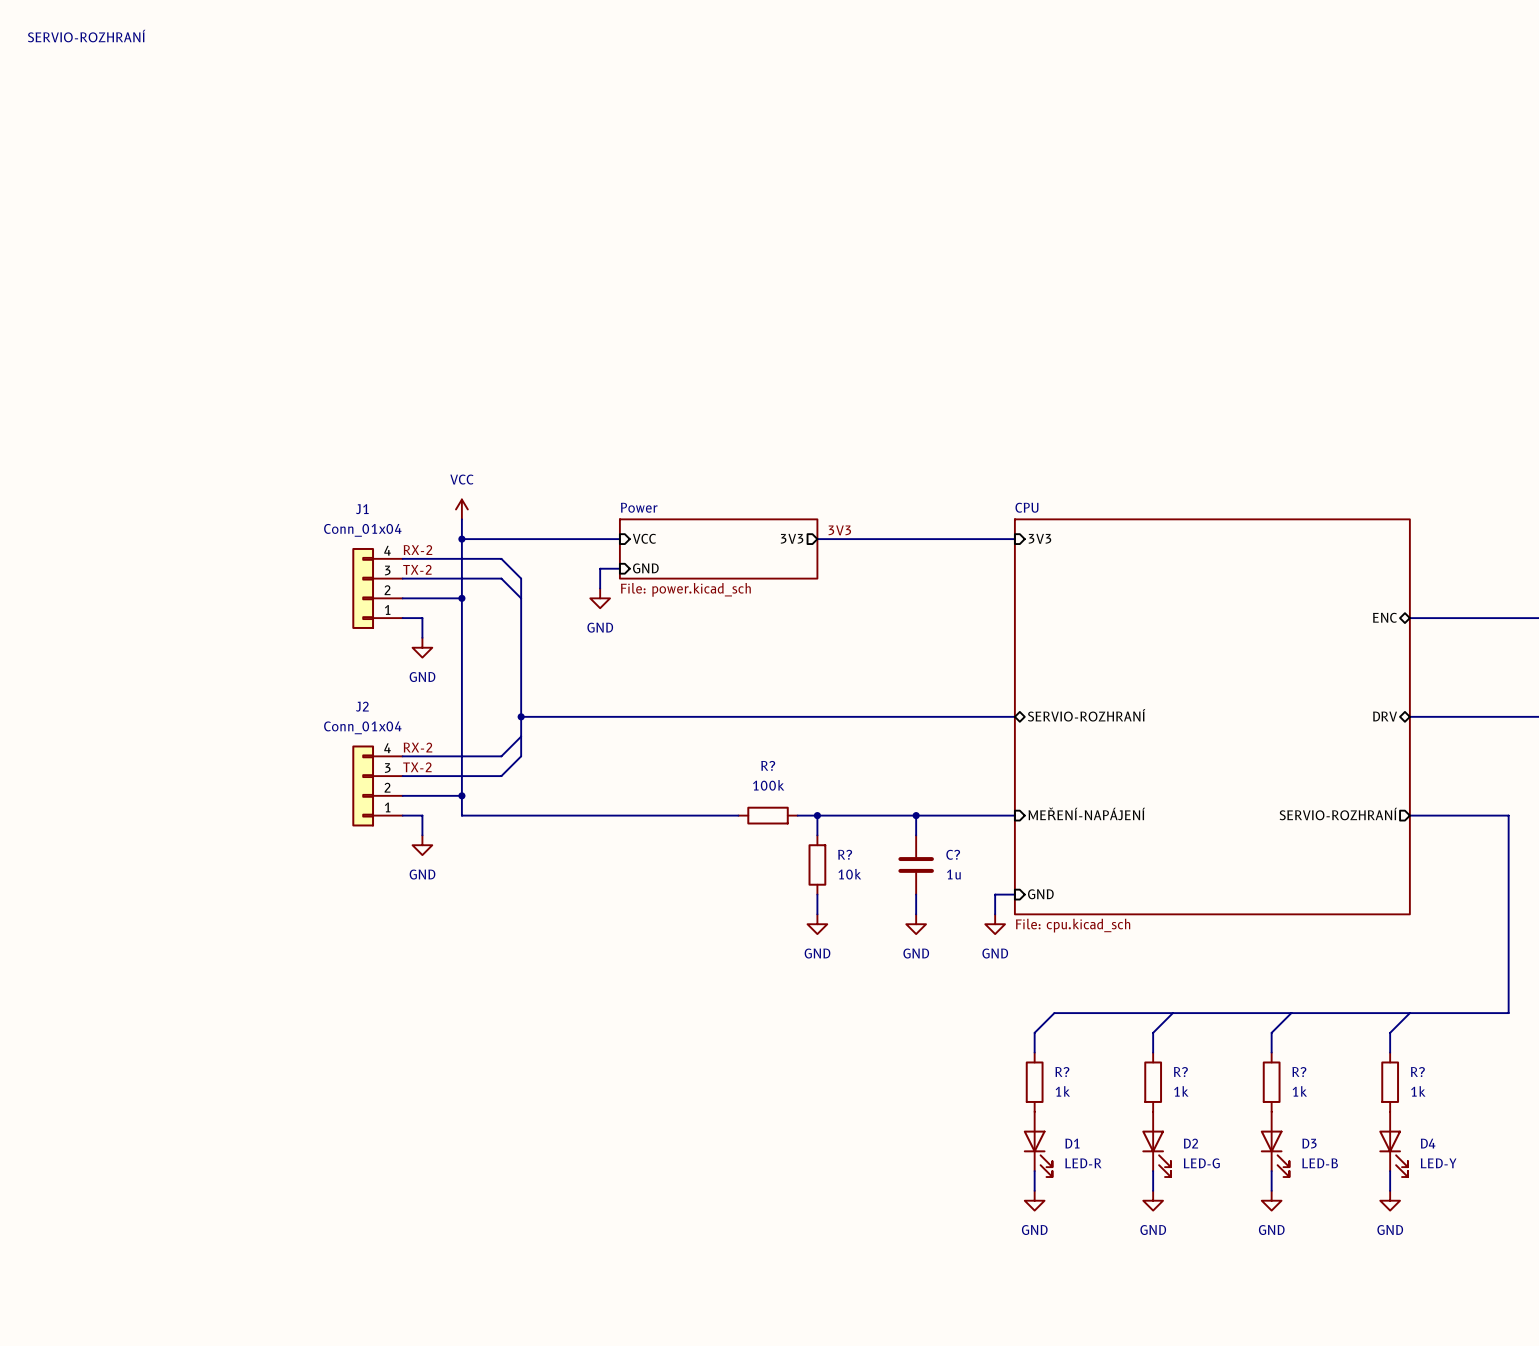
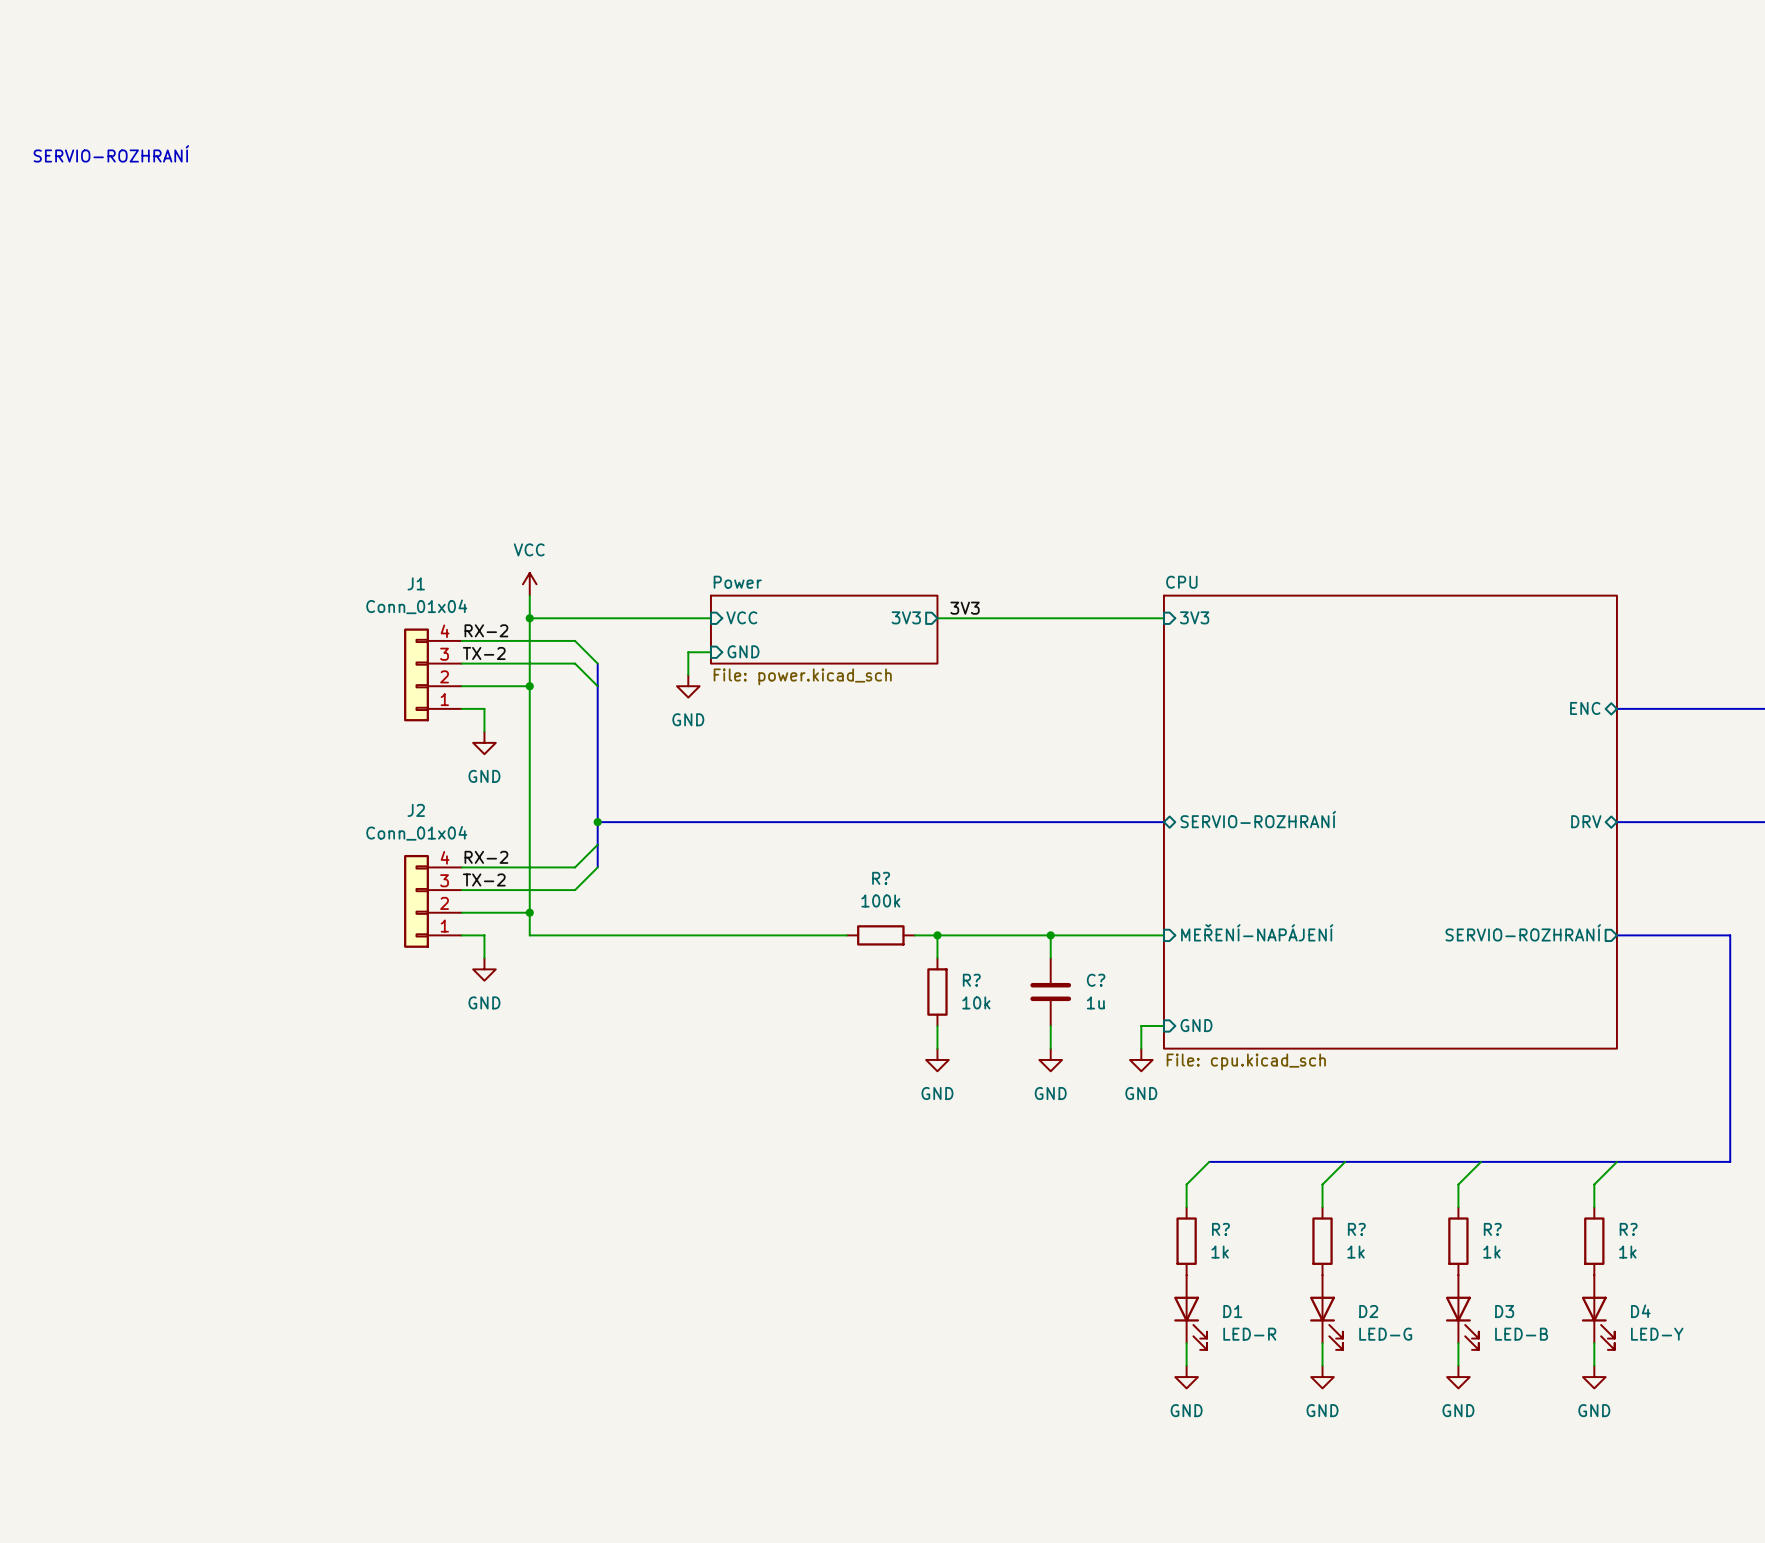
text position: SERVIO-ROZHRANÍ (86, 36) -> SERVIO-ROZHRANÍ (111, 153)

